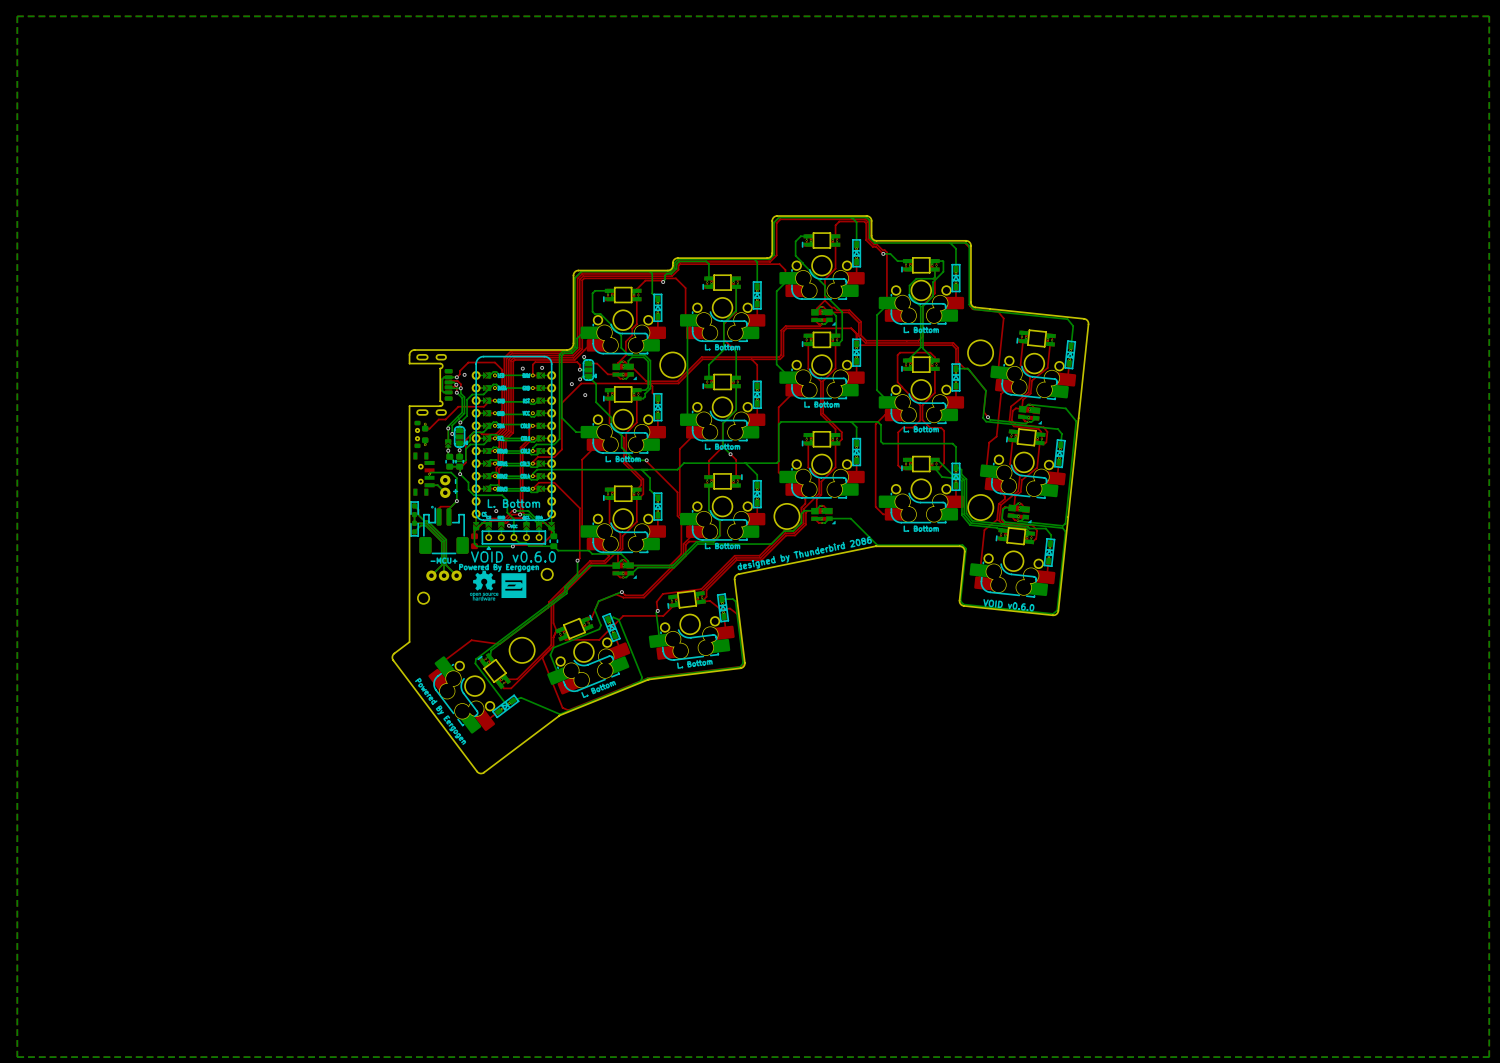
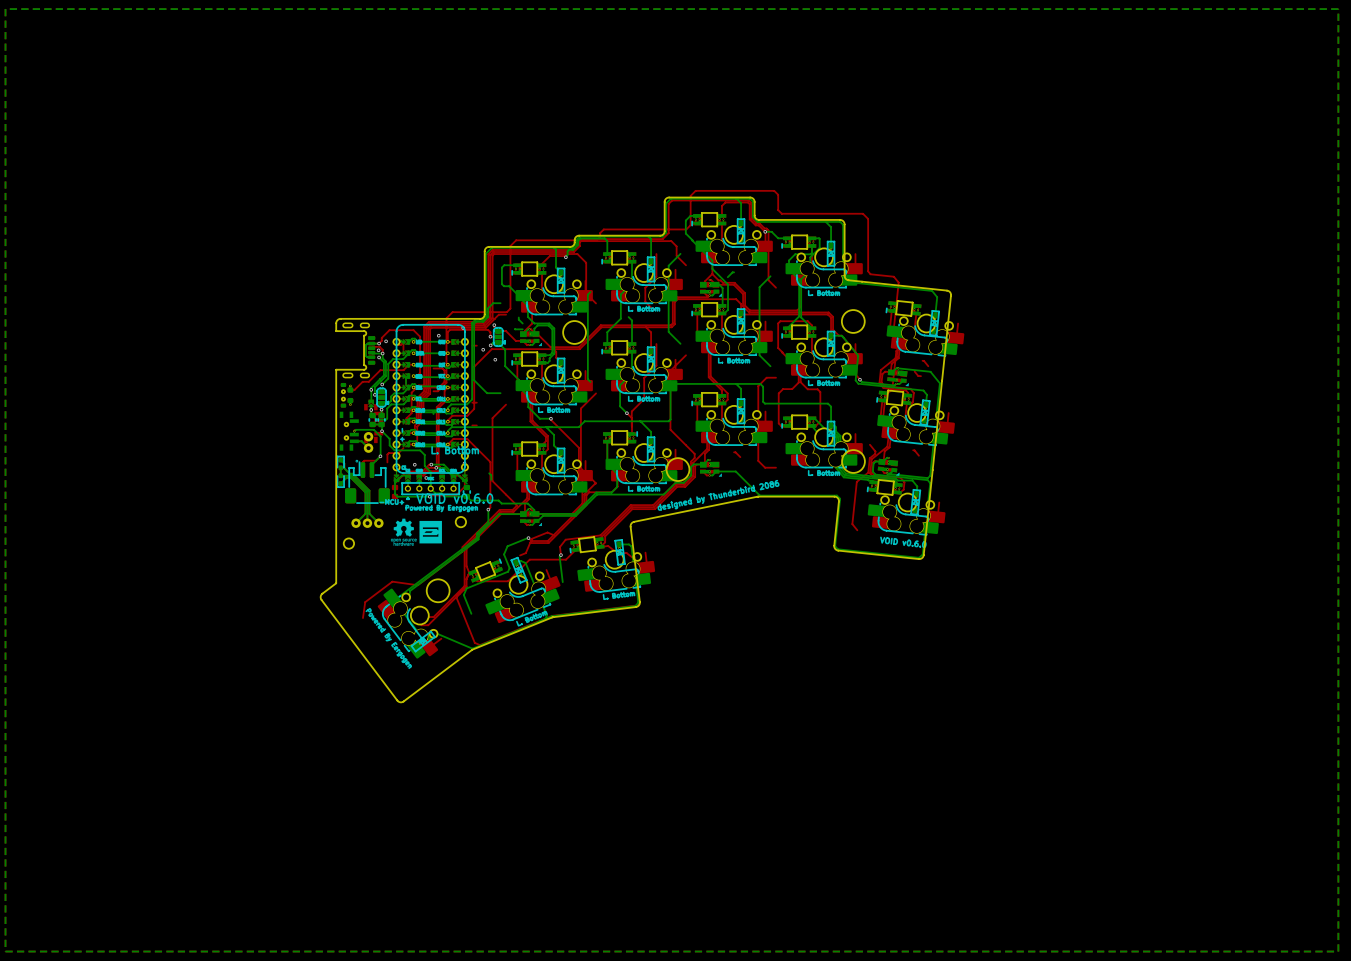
bottom track: (851, 217) (856, 222) (856, 244) -> (736, 198) (741, 203) (741, 223)
bottom track: (808, 236) (800, 236) (795, 241) (795, 255) (824, 285) (824, 294) (842, 312) (842, 340) (835, 344) -> (697, 215) (690, 215) (685, 220) (685, 233) (712, 260) (712, 268) (728, 284) (728, 309) (721, 313)
top track: (835, 236) (835, 225) (839, 221) (864, 221) (866, 223) (866, 240) (883, 253) -> (721, 215) (721, 205) (725, 202) (748, 202) (749, 219) (765, 231)
part position: (821, 240) -> (709, 219)
bottom track: (950, 242) (955, 248) (955, 269) -> (825, 221) (831, 227) (831, 245)
top track: (835, 244) (835, 268) (824, 279) (824, 300) (836, 310) (849, 310) (861, 321) (861, 335) (866, 340) (918, 340) (922, 336) (922, 305) (934, 293) (934, 269) -> (721, 223) (721, 245) (712, 254) (712, 274) (723, 282) (734, 282) (745, 293) (745, 305) (749, 310) (797, 310) (801, 306) (801, 278) (811, 267) (811, 245)
part position: (856, 253) -> (741, 231)
bottom track: (883, 253) (890, 253) (897, 261) (907, 261) -> (765, 231) (771, 231) (778, 238) (787, 238)
via position: (883, 253) -> (765, 231)
bottom track: (754, 259) (757, 262) (757, 289) -> (648, 236) (651, 239) (651, 264)
bottom track: (934, 261) (943, 261) (943, 271) (933, 282) (933, 296) (922, 306) (922, 348) (934, 360) -> (811, 238) (819, 238) (819, 247) (810, 257) (810, 270) (801, 279) (801, 317) (811, 328)
part position: (920, 265) -> (799, 242)
bottom track: (934, 269) (933, 278) (916, 278) (909, 285) (909, 295) (920, 306) (920, 347) (907, 360) -> (811, 245) (810, 254) (795, 254) (788, 260) (788, 269) (799, 279) (799, 316) (787, 328)
bottom track: (650, 271) (652, 273) (652, 293) (657, 299) -> (554, 247) (556, 249) (556, 267) (561, 272)
bottom track: (708, 278) (708, 264) (706, 261) (679, 261) (676, 264) (676, 268) (671, 273) (665, 275) (663, 282) -> (607, 254) (607, 241) (604, 238) (580, 238) (573, 249) (567, 251) (565, 257)
bottom track: (789, 278) (776, 291) (776, 364) (789, 377) -> (680, 253) (668, 265) (668, 331) (680, 343)
part position: (955, 278) -> (831, 253)
top track: (663, 282) (645, 280) (636, 290) -> (565, 257) (549, 256) (542, 265)
via position: (663, 282) -> (565, 257)
part position: (721, 282) -> (619, 257)
bottom track: (736, 286) (736, 310) (723, 323) (723, 349) (708, 364) (708, 377) -> (632, 261) (632, 283) (620, 294) (620, 318) (607, 332) (607, 344)
bottom track: (609, 290) (595, 290) (592, 293) (592, 311) (594, 314) (600, 314) (621, 335) (621, 347) (628, 355) (644, 355) (650, 360) (650, 388) (643, 398) (636, 398) -> (517, 265) (504, 265) (501, 267) (501, 284) (509, 286) (527, 305) (527, 316) (534, 323) (549, 323) (554, 328) (554, 353) (547, 362) (542, 362)
top track: (795, 290) (785, 280) (785, 269) (779, 264) (679, 264) (678, 269) (672, 276) (583, 276) (579, 279) (579, 348) (572, 355) (512, 355) (508, 359) (508, 430) (501, 438) (501, 449) (498, 452) (498, 460) (494, 463) (489, 463) -> (686, 265) (676, 255) (676, 246) (671, 241) (581, 241) (579, 246) (573, 252) (493, 252) (490, 254) (490, 317) (484, 323) (429, 323) (426, 327) (426, 392) (419, 398) (416, 418) (413, 421) (409, 421)
part position: (622, 295) -> (529, 269)
part position: (757, 295) -> (651, 269)
top track: (636, 299) (636, 324) (632, 328) (632, 335) (625, 341) (625, 355) (617, 363) (617, 366) -> (542, 272) (542, 295) (537, 299) (537, 305) (532, 311) (532, 323) (524, 330) (524, 333)
top track: (824, 300) (816, 308) (816, 312) -> (712, 273) (704, 281) (704, 284)
bottom track: (889, 303) (877, 315) (877, 390) (889, 402) -> (770, 276) (759, 287) (759, 355) (770, 366)
part position: (657, 307) -> (561, 280)
top track: (821, 307) (828, 312) (848, 312) (858, 322) (858, 336) (865, 342) (953, 342) (958, 347) (958, 362) (964, 368) (968, 368) (985, 390) (983, 412) (987, 417) -> (709, 279) (715, 284) (733, 284) (743, 294) (743, 306) (749, 312) (828, 312) (833, 316) (833, 329) (838, 335) (841, 335) (858, 355) (856, 375) (859, 379)
bottom track: (827, 312) (832, 312) (836, 316) (835, 335) -> (714, 284) (719, 284) (722, 288) (721, 305)
part position: (823, 315) -> (710, 287)
top track: (895, 315) (886, 307) (886, 252) (868, 239) (868, 222) (865, 219) (780, 219) (776, 223) (776, 255) (770, 261) (679, 261) (671, 273) (582, 273) (577, 278) (577, 347) (571, 353) (512, 353) (506, 358) (506, 429) (499, 437) (499, 446) (494, 450) (489, 450) -> (775, 287) (768, 280) (768, 230) (751, 218) (751, 203) (748, 200) (672, 200) (668, 203) (668, 233) (662, 239) (580, 239) (573, 249) (492, 249) (488, 254) (488, 316) (483, 321) (429, 321) (424, 326) (424, 391) (417, 397) (417, 406) (413, 410) (409, 410)
top track: (814, 319) (818, 324) (821, 324) (820, 326) (785, 326) (781, 330) (781, 355) (779, 357) (701, 357) (677, 381) (646, 381) (631, 366) (623, 361) -> (702, 291) (709, 295) (707, 297) (676, 297) (672, 301) (672, 323) (670, 325) (600, 325) (578, 347) (550, 347) (529, 329)
bottom track: (829, 319) (825, 324) (821, 324) -> (716, 291) (709, 295)
bottom track: (690, 320) (687, 323) (687, 416) (690, 419) -> (590, 291) (587, 294) (587, 379) (590, 381)
bottom track: (591, 332) (582, 332) (577, 338) (577, 348) (571, 353) (564, 353) (561, 355) (561, 417) (576, 432) (591, 432) -> (500, 303) (493, 303) (488, 308) (488, 317) (483, 321) (476, 321) (474, 323) (474, 380) (487, 393) (500, 393)
top track: (696, 332) (685, 322) (685, 288) (675, 278) (584, 278) (582, 280) (582, 349) (573, 357) (513, 357) (511, 360) (511, 431) (503, 439) (503, 450) (500, 453) (500, 463) (496, 467) (496, 474) (489, 476) -> (596, 303) (586, 293) (586, 262) (577, 254) (494, 254) (492, 255) (492, 318) (484, 325) (430, 325) (428, 328) (428, 392) (421, 399) (421, 409) (418, 412) (418, 421) (414, 425) (414, 431) (409, 433)
part position: (1036, 338) -> (903, 308)
part position: (821, 339) -> (709, 309)
top track: (1023, 341) (1020, 365) (1030, 376) (1028, 392) (1011, 406) (1009, 420) (1013, 426) (1038, 429) (1040, 434) -> (891, 310) (889, 332) (898, 343) (896, 357) (880, 370) (879, 383) (883, 388) (906, 390) (907, 395)
top track: (808, 344) (808, 368) (820, 381) (820, 414) (835, 429) (835, 435) -> (697, 313) (697, 335) (708, 347) (708, 377) (721, 390) (721, 395)
top track: (835, 344) (835, 368) (823, 381) (823, 413) (841, 432) (841, 439) (835, 443) (835, 467) (821, 481) (821, 494) (816, 499) (816, 510) (807, 510) (805, 512) (805, 524) (795, 535) (786, 535) (761, 560) (736, 560) (706, 590) (706, 596) (701, 601) (709, 600) (721, 609) (730, 608) (737, 614) (742, 666) (648, 678) (568, 710) (562, 707) (542, 656) -> (721, 313) (721, 335) (710, 346) (710, 376) (727, 393) (727, 399) (721, 403) (721, 425) (709, 438) (709, 449) (704, 453) (704, 464) (696, 464) (695, 476) (685, 486) (677, 486) (654, 509) (632, 509) (605, 536) (605, 542) (600, 546) (608, 545) (618, 553) (626, 552) (633, 558) (637, 605) (552, 615) (479, 645) (474, 642) (456, 596)
top track: (1050, 344) (1047, 367) (1032, 380) (1030, 393) (1022, 399) (1022, 406) (1024, 409) (1015, 408) (1012, 410) (1011, 420) (1015, 424) (1043, 427) (1047, 431) (1046, 442) (1039, 442) (1037, 467) (1021, 480) (1020, 491) (1015, 496) (1013, 508) (1002, 508) (1001, 520) (1003, 522) (1033, 525) (1037, 530) (1036, 538) (1029, 541) -> (916, 313) (914, 335) (899, 346) (898, 358) (891, 363) (891, 370) (892, 372) (885, 371) (882, 373) (881, 382) (884, 386) (910, 388) (913, 393) (912, 402) (906, 403) (904, 425) (890, 436) (889, 447) (884, 451) (883, 461) (873, 462) (872, 472) (874, 475) (900, 477) (904, 482) (903, 489) (897, 492)
top track: (597, 345) (589, 345) (574, 359) (513, 361) (513, 432) (505, 440) (502, 465) (499, 469) (499, 485) (496, 488) (489, 488) -> (506, 314) (498, 314) (485, 327) (430, 329) (430, 393) (423, 400) (420, 423) (417, 426) (417, 441) (414, 444) (409, 444)
bottom track: (1071, 346) (1073, 326) (1067, 319) (973, 309) (969, 304) (969, 246) (966, 242) (874, 242) (869, 237) (869, 220) (866, 217) (779, 217) (773, 222) (773, 254) (769, 259) (678, 259) (670, 271) (581, 271) (574, 278) (574, 347) (571, 351) (563, 351) (559, 354) (559, 439) (554, 444) (536, 444) (532, 450) (502, 450) (496, 447) (489, 450) -> (935, 315) (937, 297) (932, 290) (847, 282) (843, 277) (843, 224) (840, 221) (757, 221) (752, 217) (752, 201) (750, 198) (670, 198) (666, 203) (666, 232) (662, 236) (579, 236) (572, 247) (491, 247) (486, 253) (486, 316) (482, 319) (475, 319) (472, 323) (472, 399) (467, 404) (451, 404) (447, 410) (420, 410) (414, 407) (409, 410)
bottom track: (732, 348) (736, 351) (736, 377) -> (628, 317) (632, 320) (632, 344)
part position: (856, 352) -> (741, 321)
round board edge position: (980, 352) -> (853, 321)
part position: (1070, 354) -> (934, 323)
top track: (584, 356) (588, 363) (597, 363) (607, 374) (615, 374) (620, 378) (623, 378) -> (494, 325) (498, 331) (506, 331) (515, 340) (522, 340) (529, 344)
via: (584, 356) -> none
top track: (751, 359) (757, 364) (757, 385) -> (645, 327) (651, 332) (651, 351)
top track: (934, 360) (934, 357) (930, 352) (900, 352) (897, 355) (897, 382) (920, 405) (920, 420) (913, 427) (903, 427) (898, 432) (898, 465) (900, 468) (907, 468) -> (811, 328) (807, 321) (780, 321) (778, 323) (778, 348) (798, 369) (798, 382) (792, 389) (783, 389) (778, 393) (778, 423) (781, 425) (787, 425)
bottom track: (623, 361) (616, 366) -> (529, 329) (523, 334)
board edge: (409, 363) (409, 353) (413, 350) (569, 349) (573, 344) (573, 275) (575, 271) (668, 270) (672, 268) (673, 260) (677, 258) (768, 257) (772, 253) (772, 219) (776, 216) (867, 216) (871, 219) (871, 236) (875, 240) (967, 241) (970, 245) (970, 302) (973, 306) (1084, 318) (1088, 322) (1058, 612) (1052, 615) (961, 605) (959, 600) (964, 551) (960, 546) (875, 546) (737, 574) (734, 579) (744, 662) (742, 667) (647, 679) (559, 715) (484, 772) (479, 773) (392, 658) (393, 653) (409, 642) (409, 406) -> none
part position: (920, 364) -> (799, 332)
via: none -> (494, 325)
round board edge position: (672, 365) -> (574, 332)
bottom track: (628, 366) (628, 360) (631, 357) (643, 357) (648, 361) (648, 387) (645, 390) (636, 390) -> (534, 333) (534, 328) (537, 325) (548, 325) (552, 329) (552, 352) (549, 355) (542, 355)
via: (542, 367) -> none
top track: (934, 368) (934, 392) (922, 405) (922, 420) (930, 427) (941, 427) (944, 430) (944, 463) (939, 468) (934, 468) -> (811, 335) (811, 357) (800, 368) (800, 382) (807, 389) (817, 389) (820, 392) (820, 421) (815, 425) (811, 425)
top track: (955, 368) (955, 348) (952, 345) (856, 345) (856, 333) (851, 328) (786, 328) (783, 331) (783, 355) (780, 359) (702, 359) (678, 383) (581, 383) (561, 402) (561, 449) (554, 457) (537, 457) (532, 462) (537, 463) -> (831, 335) (831, 317) (827, 314) (741, 314) (741, 304) (736, 299) (677, 299) (674, 302) (674, 324) (671, 327) (601, 327) (579, 349) (491, 349) (474, 366) (474, 408) (467, 415) (452, 415) (447, 420) (452, 421)
bottom track: (955, 368) (967, 368) (986, 390) (983, 417) (986, 421) (1058, 429) (1061, 433) (1060, 444) -> (831, 335) (841, 335) (858, 355) (855, 380) (858, 383) (923, 390) (926, 394) (925, 404)
via: (579, 369) -> none
top track: (588, 370) (580, 370) (579, 364) (577, 362) (535, 362) (532, 364) (532, 375) (537, 375) -> (498, 336) (490, 336) (488, 329) (450, 329) (447, 332) (447, 341) (452, 341)
part position: (589, 370) -> (499, 336)
part position: (624, 370) -> (531, 337)
board edge: none -> (336, 331) (336, 321) (340, 318) (481, 318) (484, 314) (484, 251) (486, 247) (570, 246) (578, 235) (661, 235) (664, 231) (664, 200) (668, 197) (750, 197) (754, 200) (754, 216) (758, 219) (841, 220) (844, 223) (844, 275) (846, 279) (947, 290) (950, 293) (923, 556) (918, 559) (836, 549) (834, 545) (838, 501) (834, 496) (757, 496) (633, 521) (630, 526) (639, 602) (638, 606) (552, 617) (471, 649) (403, 701) (399, 702) (320, 598) (322, 593) (336, 583) (336, 369)
via: (464, 374) -> none
bottom track: (630, 374) (626, 378) (623, 378) -> (536, 340) (529, 344)
bottom track: (489, 375) (496, 371) (499, 375) (532, 375) -> (409, 341) (414, 338) (418, 341) (447, 341)
bottom track: (456, 377) (444, 377) (442, 379) (442, 390) (448, 392) -> (379, 343) (365, 345) (365, 355) (371, 357)
via: (456, 377) -> none
via: none -> (438, 335)
part position: (955, 377) -> (831, 343)
via: none -> (490, 336)
bottom track: (580, 379) (583, 376) (588, 376) (596, 384) (596, 402) (611, 417) (611, 425) (621, 435) (621, 447) (634, 460) (646, 460) -> (490, 345) (493, 342) (498, 342) (505, 349) (505, 366) (519, 380) (519, 386) (528, 396) (528, 407) (539, 418) (550, 418)
via: (580, 379) -> none
top track: (448, 382) (457, 380) (460, 384) (460, 388) -> (371, 348) (379, 346) (382, 353)
part position: (721, 382) -> (619, 347)
via: none -> (386, 341)
top track: (649, 383) (652, 386) (652, 393) (657, 398) -> (553, 349) (556, 351) (556, 357) (561, 362)
part position: (430, 384) -> (355, 350)
via: (456, 384) -> none
via: (571, 384) -> none
via: none -> (379, 343)
bottom track: (736, 386) (736, 410) (723, 423) (723, 446) (730, 454) -> (632, 351) (632, 373) (620, 385) (620, 406) (626, 413)
bottom track: (448, 387) (460, 388) -> (371, 352) (382, 353)
bottom track: (489, 387) (496, 384) (500, 388) (532, 388) -> (409, 353) (414, 350) (418, 353) (447, 353)
via: none -> (490, 345)
bottom track: (460, 388) (460, 393) (464, 397) (464, 413) (458, 418) -> (382, 353) (382, 358) (385, 361) (385, 376) (380, 381)
via: (460, 388) -> none
bottom track: (489, 388) (483, 394) (472, 394) (467, 399) (467, 415) (460, 422) -> (409, 353) (403, 359) (393, 359) (388, 363) (388, 378) (382, 384)
top track: (795, 390) (778, 407) (778, 472) (805, 499) (805, 503) (801, 507) (801, 522) (793, 531) (784, 531) (759, 555) (734, 555) (701, 589) (662, 593) (656, 601) (657, 610) -> (686, 355) (670, 370) (670, 429) (694, 453) (694, 458) (691, 461) (691, 475) (683, 482) (675, 482) (653, 505) (630, 505) (600, 535) (565, 539) (559, 546) (560, 555)
top track: (448, 392) (442, 390) (442, 379) (444, 377) (456, 377) (468, 362) (494, 362) (502, 369) (502, 409) (498, 413) -> (371, 357) (365, 355) (367, 343) (379, 343) (389, 330) (413, 330) (420, 336) (420, 373) (416, 376)
bottom track: (456, 392) (462, 398) (462, 412) (458, 416) -> (379, 357) (383, 362) (383, 375) (380, 379)
via: (456, 392) -> none
via: none -> (483, 349)
via: none -> (378, 350)
part position: (622, 394) -> (529, 359)
part position: (757, 394) -> (651, 359)
via: (585, 395) -> none
via: none -> (382, 353)
top track: (609, 398) (609, 423) (624, 437) (624, 463) (641, 480) (641, 485) (636, 489) -> (517, 362) (517, 385) (530, 398) (530, 421) (545, 436) (545, 441) (542, 445)
top track: (636, 398) (636, 422) (626, 433) (626, 462) (643, 479) (643, 494) (636, 497) (636, 521) (622, 536) (622, 549) (617, 553) (617, 565) (591, 565) (553, 603) (553, 623) (556, 630) (553, 637) (553, 646) (511, 688) (503, 688) (499, 684) -> (542, 362) (542, 384) (532, 394) (532, 420) (547, 436) (547, 449) (542, 452) (542, 474) (529, 487) (529, 499) (524, 503) (524, 513) (501, 513) (466, 548) (466, 566) (469, 572) (466, 586) (428, 625) (421, 625) (418, 621)
top track: (494, 400) (489, 400) (483, 406) (458, 406) (445, 419) (438, 419) (429, 428) (425, 428) -> (413, 364) (409, 364) (403, 370) (380, 370) (368, 381) (362, 381) (354, 390) (350, 390)
bottom track: (494, 400) (528, 401) (531, 404) (537, 400) -> (413, 364) (444, 365) (446, 367) (452, 364)
via: none -> (379, 357)
via: none -> (495, 359)
bottom track: (1030, 404) (1065, 408) (1076, 421) (1065, 523) (1062, 525) (1017, 520) (1020, 520) (1025, 517) -> (898, 368) (930, 371) (939, 383) (930, 476) (927, 478) (887, 473) (894, 470)
bottom track: (1030, 404) (1022, 409) -> (898, 368) (891, 372)
part position: (657, 407) -> (561, 370)
bottom track: (494, 413) (528, 414) (531, 416) (537, 413) -> (413, 376) (444, 377) (446, 379) (452, 376)
part position: (1029, 414) -> (898, 376)
top track: (895, 415) (884, 415) (875, 424) (875, 506) (883, 514) (895, 514) -> (775, 377) (766, 377) (758, 386) (758, 460) (765, 467) (775, 467)
bottom track: (457, 416) (448, 426) (448, 440) -> (380, 379) (371, 387) (371, 400)
bottom track: (987, 417) (990, 419) (1026, 423) (1036, 418) -> (859, 379) (861, 382) (894, 385) (903, 380)
via position: (987, 417) -> (859, 379)
bottom track: (458, 418) (452, 425) (452, 433) (455, 436) (459, 436) -> (380, 381) (374, 387) (374, 394) (381, 397)
bottom track: (851, 421) (856, 427) (856, 443) -> (736, 383) (741, 388) (741, 403)
via: (460, 422) -> none
bottom track: (491, 424) (496, 422) (498, 424) (532, 425) -> (410, 386) (414, 384) (417, 386) (447, 387)
bottom track: (491, 424) (483, 432) (473, 432) (467, 443) (459, 443) (459, 456) -> (410, 386) (403, 393) (394, 393) (388, 403) (381, 403) (381, 415)
top track: (537, 425) (532, 425) (529, 429) (529, 438) (520, 447) (520, 514) (511, 514) (505, 520) (491, 520) (488, 523) -> (452, 387) (447, 387) (444, 390) (444, 399) (436, 407) (436, 467) (428, 467) (423, 473) (410, 473) (407, 475)
via: (448, 428) -> none
via: none -> (382, 384)
top track: (696, 432) (679, 449) (679, 515) (696, 531) (683, 543) (683, 554) (643, 595) (625, 595) (621, 592) -> (596, 393) (580, 408) (580, 468) (596, 483) (584, 494) (584, 504) (547, 541) (531, 541) (528, 538)
via: (452, 433) -> none
part position: (421, 434) -> (347, 395)
via: none -> (371, 389)
part position: (460, 436) -> (382, 397)
part position: (1026, 437) -> (894, 397)
bottom track: (494, 438) (531, 442) (537, 438) -> (413, 398) (446, 402) (452, 398)
bottom track: (532, 438) (504, 438) (502, 436) (490, 434) (489, 438) (483, 444) (470, 444) (465, 449) (464, 461) (454, 461) (448, 455) (448, 445) -> (447, 398) (421, 398) (409, 395) (403, 404) (391, 404) (387, 408) (386, 419) (376, 419) (371, 414) (371, 405)
top track: (537, 438) (532, 438) (522, 448) (524, 518) (511, 518) (506, 523) (501, 523) -> none
part position: (821, 439) -> (709, 399)
top track: (1012, 440) (1010, 464) (1019, 476) (1018, 491) (1000, 505) (999, 520) (1002, 524) (1025, 527) (1030, 533) -> (882, 400) (880, 422) (888, 433) (887, 446) (871, 459) (870, 473) (873, 476) (893, 479) (898, 484)
via: none -> (374, 394)
part position: (448, 443) -> (371, 403)
part position: (513, 443) -> (430, 403)
top track: (808, 443) (808, 467) (819, 478) (819, 493) (803, 509) (803, 523) (794, 533) (785, 533) (760, 557) (735, 557) (700, 593) -> (697, 403) (697, 425) (707, 435) (707, 448) (693, 462) (693, 476) (684, 484) (676, 484) (654, 507) (631, 507) (599, 539)
top track: (597, 444) (582, 459) (582, 529) (609, 556) (604, 560) (590, 560) (549, 601) (548, 607) (499, 644) (471, 640) (441, 662) (439, 680) -> (506, 404) (492, 418) (492, 481) (517, 505) (512, 509) (499, 509) (462, 547) (461, 552) (417, 585) (392, 581) (365, 602) (362, 618)
via: (448, 450) -> none
via: (459, 450) -> none
bottom track: (537, 450) (537, 454) (501, 453) (494, 451) -> none
part footprint: [413, 452, 435, 496] -> [369, 412, 377, 428]
part position: (856, 452) -> (741, 411)
part position: (1059, 453) -> (925, 412)
top track: (730, 454) (736, 459) (736, 477) -> (626, 413) (632, 418) (632, 433)
via position: (730, 454) -> (626, 413)
via: none -> (381, 409)
via: none -> (371, 410)
bottom track: (934, 459) (937, 459) (953, 475) (959, 475) (964, 480) (964, 514) (971, 522) (1026, 528) (1030, 533) -> (811, 418) (814, 418) (828, 432) (834, 432) (838, 436) (838, 467) (844, 475) (894, 480) (898, 484)
top track: (646, 460) (677, 492) (677, 515) (681, 519) (681, 553) (669, 565) (630, 565) (623, 560) -> (550, 418) (578, 447) (578, 469) (582, 472) (582, 503) (571, 514) (535, 514) (529, 509)
via position: (646, 460) -> (550, 418)
part: (449, 461) -> none
part: (459, 461) -> none
bottom track: (502, 461) (504, 463) (532, 463) -> (444, 412) (451, 413) (452, 410)
bottom track: (537, 463) (537, 467) (503, 465) (494, 463) -> (452, 421) (451, 424) (413, 421)
bottom track: (745, 463) (757, 474) (757, 485) -> none
part position: (920, 464) -> (799, 422)
bottom track: (449, 466) (460, 467) (460, 474) (468, 482) (468, 489) (474, 495) (502, 495) (507, 500) (507, 512) (513, 519) (513, 533) (511, 535) (518, 542) (525, 542) (529, 546) (553, 546) (558, 550) (588, 550) (592, 553) (621, 553) (628, 561) (628, 565) (673, 565) (696, 541) (713, 541) (719, 535) (719, 521) (708, 510) (708, 485) -> (372, 424) (382, 424) (382, 431) (389, 438) (389, 445) (394, 450) (420, 450) (424, 454) (424, 466) (430, 471) (430, 485) (428, 486) (435, 493) (441, 493) (444, 496) (466, 496) (470, 500) (527, 503) (534, 510) (534, 513) (574, 513) (596, 492) (611, 492) (617, 487) (617, 473) (607, 463) (607, 441)
bottom track: (934, 468) (942, 477) (958, 478) (961, 481) (961, 515) (970, 525) (997, 527) (1003, 530) -> (811, 425) (818, 433) (833, 434) (836, 437) (836, 468) (843, 477) (873, 482)
bottom track: (641, 469) (650, 478) (650, 489) (657, 497) -> (546, 427) (553, 434) (553, 445) (561, 452)
part: none -> (381, 419)
bottom track: none -> (447, 421) (422, 421) (414, 418) (409, 418) (409, 421)
bottom track: none -> (640, 421) (651, 431) (651, 441)
bottom track: (429, 474) (451, 472) (456, 478) (456, 501) (448, 509) (448, 516) -> none
via: (460, 474) -> none
bottom track: (489, 476) (492, 472) (496, 472) (500, 476) (532, 476) (537, 469) (677, 469) (683, 463) (776, 463) (778, 461) (778, 424) (781, 421) (877, 421) (880, 424) (880, 441) (883, 443) (952, 443) (955, 446) (955, 468) (961, 469) (961, 474) (966, 479) (966, 513) (972, 520) (1027, 526) (1029, 528) (1045, 528) (1051, 535) (1050, 543) -> (409, 433) (411, 429) (414, 429) (418, 433) (447, 433) (451, 427) (578, 427) (584, 421) (668, 421) (670, 419) (670, 386) (672, 383) (760, 383) (763, 386) (763, 401) (764, 403) (828, 403) (831, 406) (831, 425) (836, 427) (836, 431) (840, 435) (840, 466) (845, 473) (897, 480) (912, 480) (917, 486) (916, 494)
bottom track: (537, 476) (537, 479) (531, 479) (497, 478) (494, 476) -> (452, 433) (451, 436) (446, 436) (415, 435) (413, 433)
part position: (955, 476) -> (831, 433)
part position: (723, 481) -> (620, 437)
part: none -> (349, 431)
bottom track: none -> (354, 431) (373, 429) (380, 436) (380, 456) (371, 464) (371, 470)
via: none -> (382, 431)
bottom track: (429, 485) (437, 485) (445, 492) -> (354, 441) (361, 441) (368, 448)
top track: (708, 485) (708, 510) (720, 521) (720, 535) (714, 541) (689, 541) (685, 544) (685, 555) (644, 597) (623, 597) -> (607, 441) (607, 463) (617, 474) (617, 486) (611, 492) (589, 492) (586, 495) (586, 505) (548, 543) (529, 543)
part position: (445, 486) -> (368, 442)
bottom track: (532, 488) (501, 488) (497, 485) (490, 485) (489, 488) -> (447, 444) (419, 444) (416, 441) (409, 441) (409, 444)
top track: (537, 488) (532, 488) (538, 482) (554, 482) (579, 508) (579, 558) (577, 560) -> (452, 444) (447, 444) (453, 438) (467, 438) (490, 462) (490, 507) (488, 509)
bottom track: (537, 488) (537, 492) (497, 490) (494, 488) -> (452, 444) (451, 447) (415, 446) (413, 444)
top track: (998, 489) (1005, 496) (1004, 499) (998, 504) (997, 519) (984, 530) (979, 576) (985, 583) -> (869, 444) (875, 453) (869, 458) (868, 472) (856, 481) (852, 524) (857, 530)
part position: (622, 493) -> (529, 449)
part position: (757, 494) -> (651, 449)
top track: (609, 497) (609, 522) (620, 533) (620, 548) (605, 563) (591, 563) (551, 602) (551, 645) (517, 679) (506, 679) -> (517, 452) (517, 475) (527, 484) (527, 498) (513, 511) (500, 511) (464, 547) (464, 586) (433, 617) (424, 617)
via: (456, 501) -> none
bottom track: (1019, 503) (1012, 508) (1005, 507) (1003, 509) (1002, 518) (1004, 522) (1062, 528) (1065, 531) (1057, 610) (1052, 613) (963, 604) (960, 600) (965, 548) (962, 545) (877, 545) (850, 518) (829, 518) (825, 522) (821, 522) -> (888, 457) (881, 462) (876, 461) (873, 463) (872, 471) (875, 474) (927, 480) (930, 483) (922, 554) (918, 557) (837, 549) (835, 546) (840, 498) (836, 495) (759, 495) (735, 471) (716, 471) (709, 475)
bottom track: (414, 505) (418, 509) (418, 515) (424, 521) (427, 521) (446, 539) (446, 565) (456, 575) -> (340, 460) (344, 463) (344, 468) (369, 490) (369, 513) (378, 523)
bottom track: (821, 505) (814, 511) (804, 510) (801, 513) (801, 522) (793, 531) (784, 531) (771, 544) (697, 544) (674, 567) (637, 567) (626, 577) (623, 577) -> (709, 459) (703, 464) (693, 464) (691, 467) (691, 475) (683, 482) (675, 482) (663, 494) (597, 494) (575, 515) (542, 515) (532, 524) (529, 524)
part position: (657, 506) -> (561, 460)
round board edge position: (980, 507) -> (853, 461)
part: (414, 509) -> none
top track: none -> (380, 456) (376, 460) (364, 460) (362, 470)
via: none -> (380, 456)
top track: (514, 510) (504, 518) (487, 518) (474, 531) -> (452, 398) (447, 398) (438, 407) (440, 471) (428, 471) (423, 475) (419, 475)
bottom track: (514, 510) (528, 510) (553, 532) -> (431, 464) (443, 464) (466, 483)
via: (514, 510) -> none
via: (496, 511) -> none
part position: (1019, 512) -> (888, 466)
bottom track: (414, 514) (414, 523) (426, 523) (444, 540) (444, 575) -> (340, 467) (340, 475) (351, 475) (367, 491) (367, 523)
bottom track: (520, 514) (528, 514) (539, 523) -> (436, 467) (444, 467) (453, 475)
via: (520, 514) -> none
part position: (823, 514) -> (710, 467)
top track: (1010, 515) (1014, 520) (1017, 520) -> (880, 468) (887, 473)
round board edge position: (786, 516) -> (678, 469)
part: none -> (340, 463)
top track: (814, 518) (818, 522) (821, 522) -> (702, 471) (709, 475)
via: none -> (414, 464)
top track: none -> (431, 464) (422, 471) (406, 471) (395, 483)
via: none -> (431, 464)
via: none -> (436, 467)
bottom track: (488, 523) (482, 523) (474, 530) (474, 543) (477, 546) (512, 546) -> (407, 475) (401, 475) (395, 482) (395, 494) (397, 496) (429, 496)
top track: (539, 523) (545, 523) (551, 529) (551, 535) (541, 545) (512, 546) -> (453, 475) (459, 475) (464, 480) (464, 486) (455, 495) (429, 496)
via: (509, 525) -> none
part: (414, 528) -> none
part position: (444, 529) -> (367, 481)
bottom track: (414, 531) (420, 525) (425, 525) (441, 541) (441, 565) (431, 575) -> (340, 483) (346, 477) (350, 477) (365, 492) (365, 513) (356, 523)
via: none -> (426, 477)
part position: (513, 535) -> (430, 487)
part: none -> (340, 480)
part: (1015, 536) -> none
part position: (474, 541) -> (395, 492)
part position: (553, 541) -> (466, 492)
part: none -> (885, 487)
via: (512, 546) -> none
part position: (1049, 552) -> (915, 502)
via: none -> (429, 496)
bottom track: (577, 560) (577, 574) (565, 586) (564, 592) (475, 659) (475, 663) (505, 703) (509, 703) -> (488, 509) (488, 522) (477, 533) (476, 538) (396, 598) (395, 602) (422, 638) (426, 639)
via: (577, 560) -> none
bottom track: (623, 560) (616, 565) (589, 565) (567, 587) (566, 593) (491, 650) (490, 657) -> (529, 509) (523, 514) (499, 514) (479, 534) (478, 539) (410, 590) (409, 597)
via: none -> (488, 509)
part position: (624, 569) -> (531, 517)
top track: (615, 573) (620, 577) (623, 577) -> (522, 520) (529, 524)
round board edge position: (547, 574) -> (460, 522)
part position: (444, 575) -> (367, 523)
drawing position: (484, 585) -> (403, 532)
drawing position: (513, 585) -> (430, 532)
bottom track: (621, 592) (598, 601) (594, 610) (601, 625) (599, 629) (553, 647) (550, 655) (558, 675) -> (528, 538) (507, 546) (504, 554) (509, 568) (508, 571) (466, 588) (463, 595) (471, 613)
via: (621, 592) -> none
round board edge position: (423, 598) -> (348, 543)
part position: (686, 599) -> (587, 544)
bottom track: (721, 599) (732, 599) (735, 601) (743, 663) (740, 667) (647, 678) (560, 714) (520, 697) (512, 701) -> (619, 544) (629, 544) (631, 546) (638, 602) (635, 605) (551, 616) (472, 648) (437, 633) (429, 636)
via: none -> (528, 538)
top track: (674, 605) (663, 615) (623, 615) (599, 639) (565, 639) (563, 637) -> (575, 549) (566, 559) (529, 559) (508, 581) (477, 581) (475, 579)
part position: (723, 607) -> (620, 552)
bottom track: (657, 610) (656, 612) (659, 640) -> (560, 555) (562, 582)
via: (657, 610) -> none
bottom track: (608, 619) (613, 617) (618, 619) (642, 677) (640, 681) -> (516, 562) (520, 560) (525, 563) (546, 615) (545, 619)
via: none -> (560, 555)
part position: (611, 627) -> (519, 570)
part position: (574, 628) -> (485, 570)
round board edge position: (522, 650) -> (438, 590)
part: (494, 670) -> none
part position: (505, 706) -> (423, 641)

